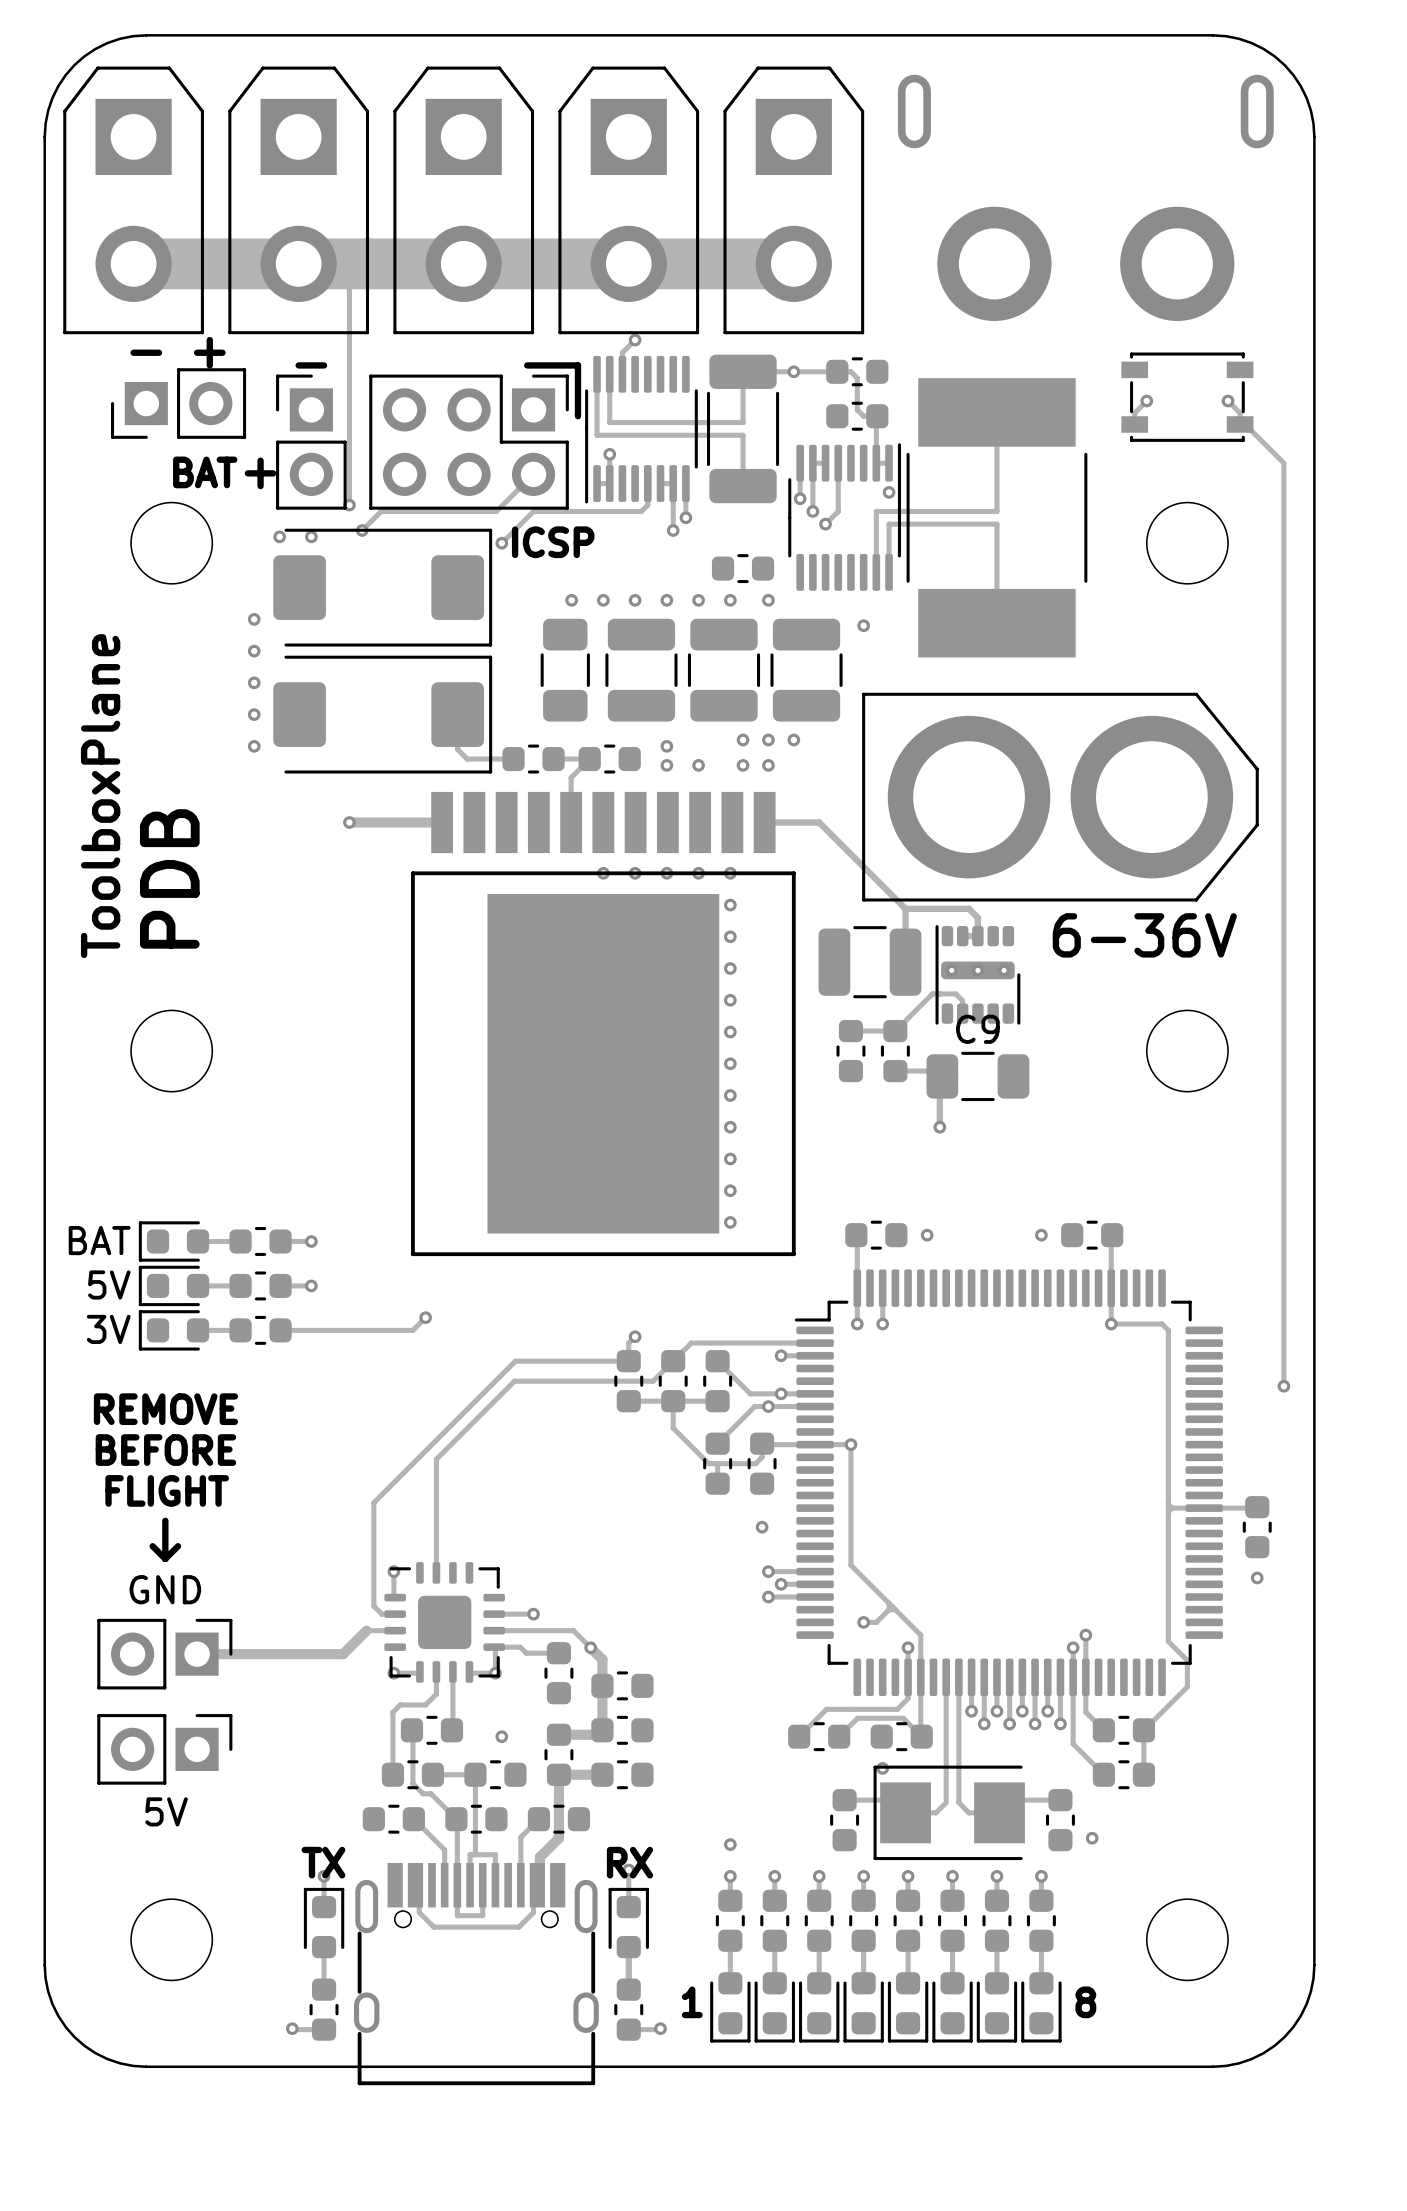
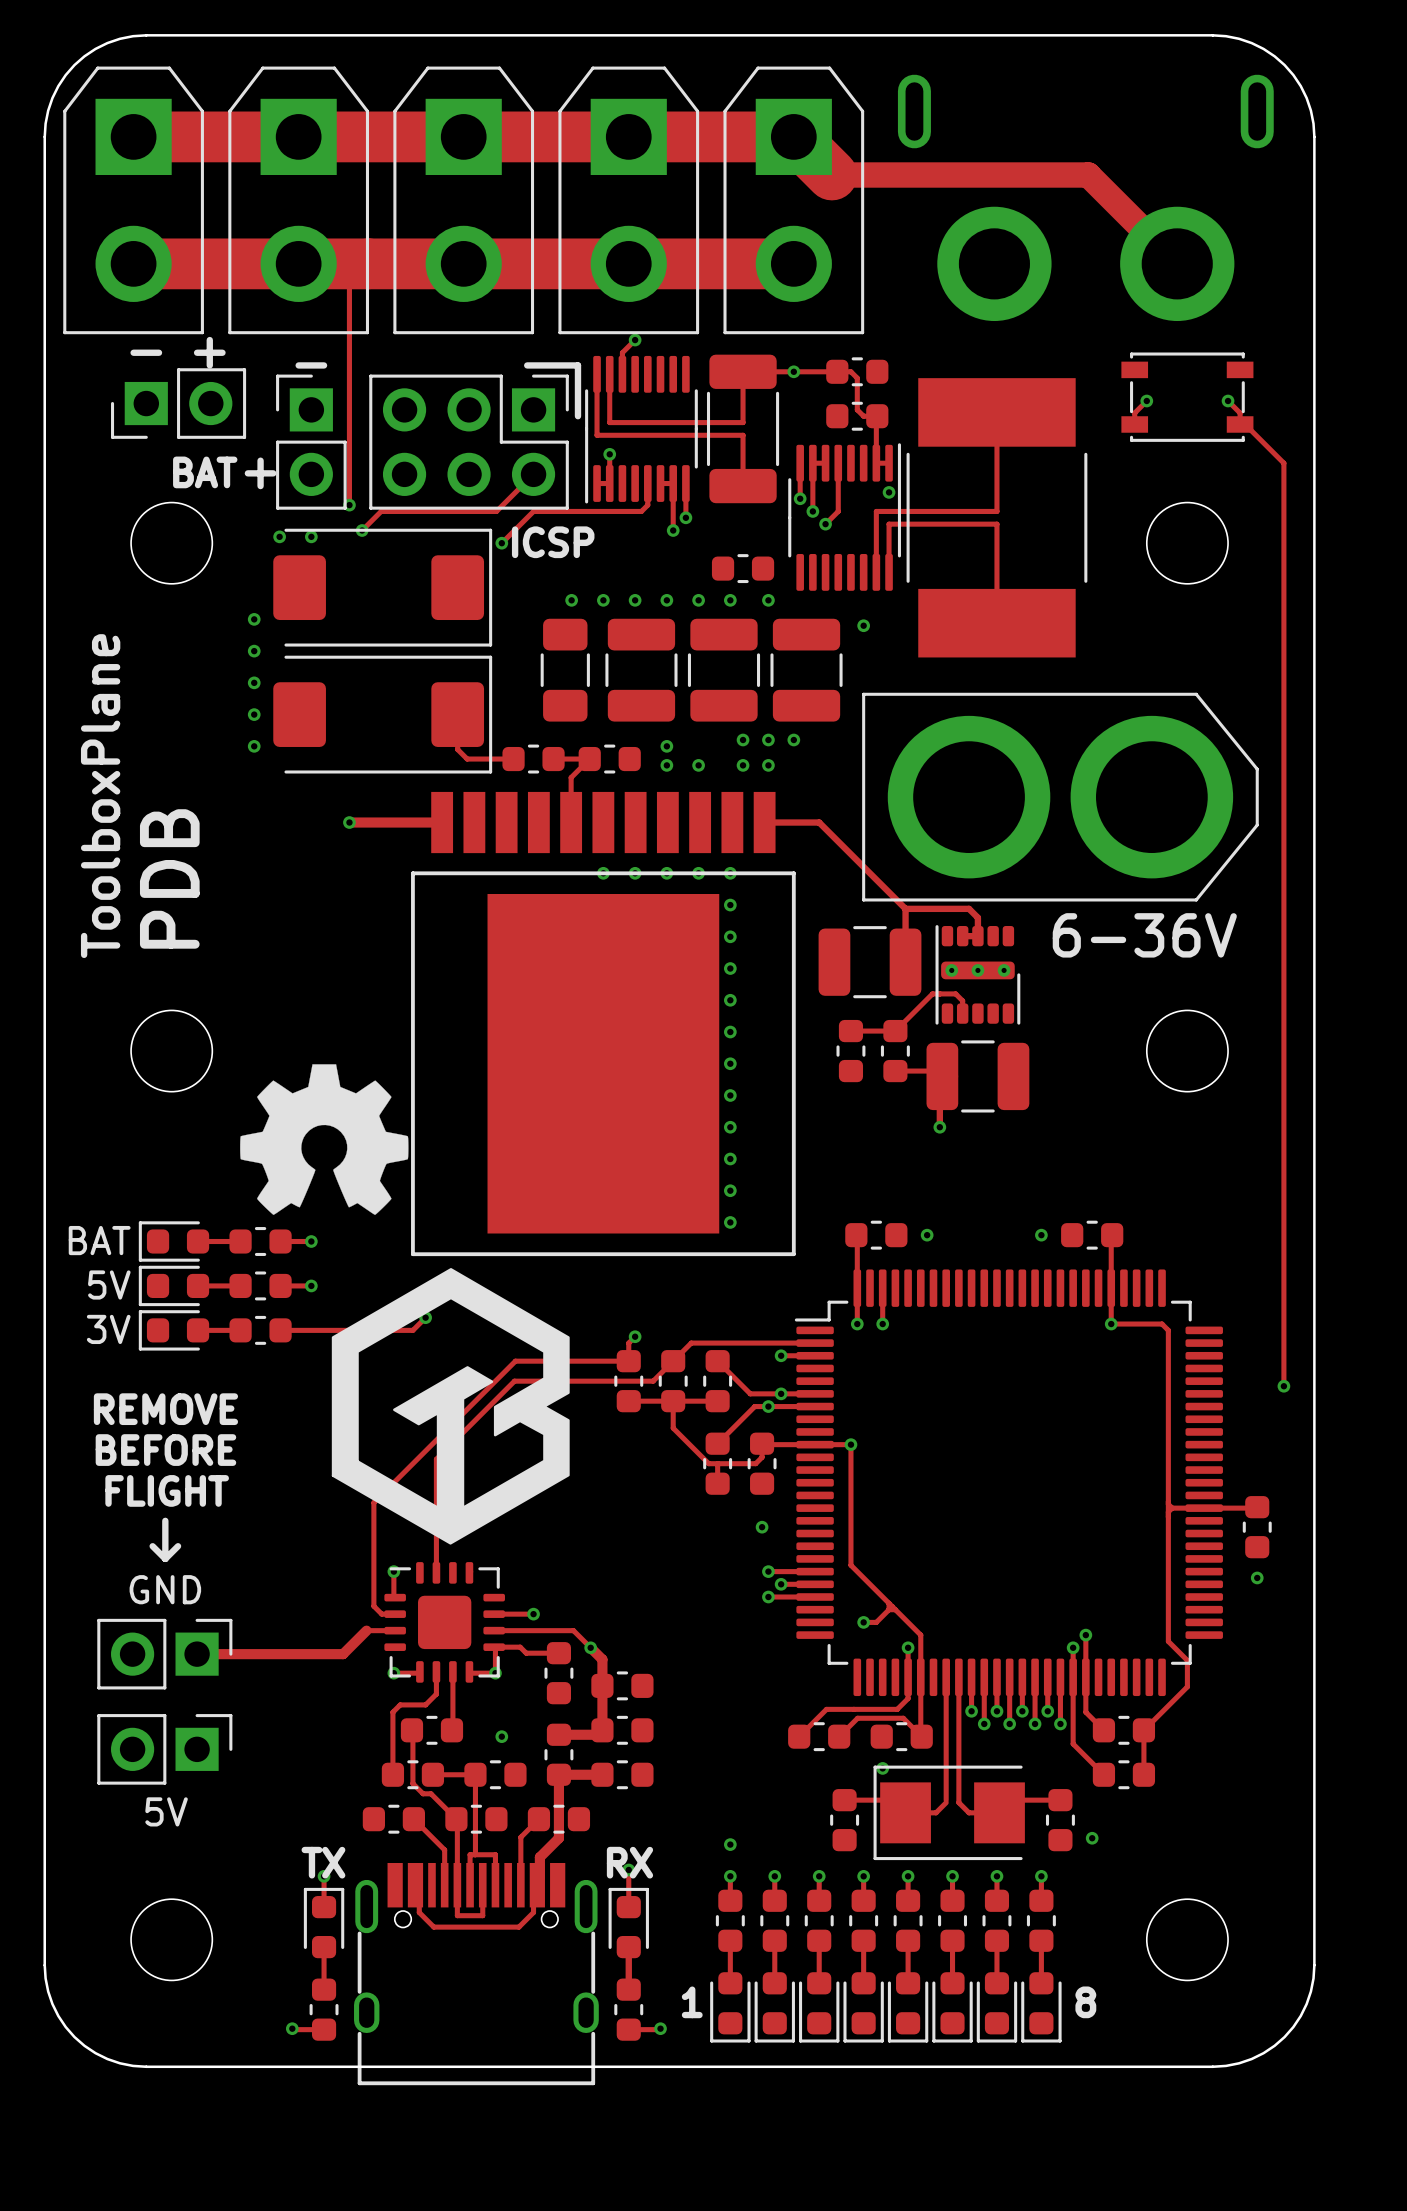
track: none -> (133, 136) (793, 136) (831, 175) (1088, 175) (1177, 263)
drawing: none -> [240, 1064, 409, 1215]
C9: (977, 1076) -> none
part: none -> (977, 1076)
drawing: none -> [331, 1268, 570, 1545]

